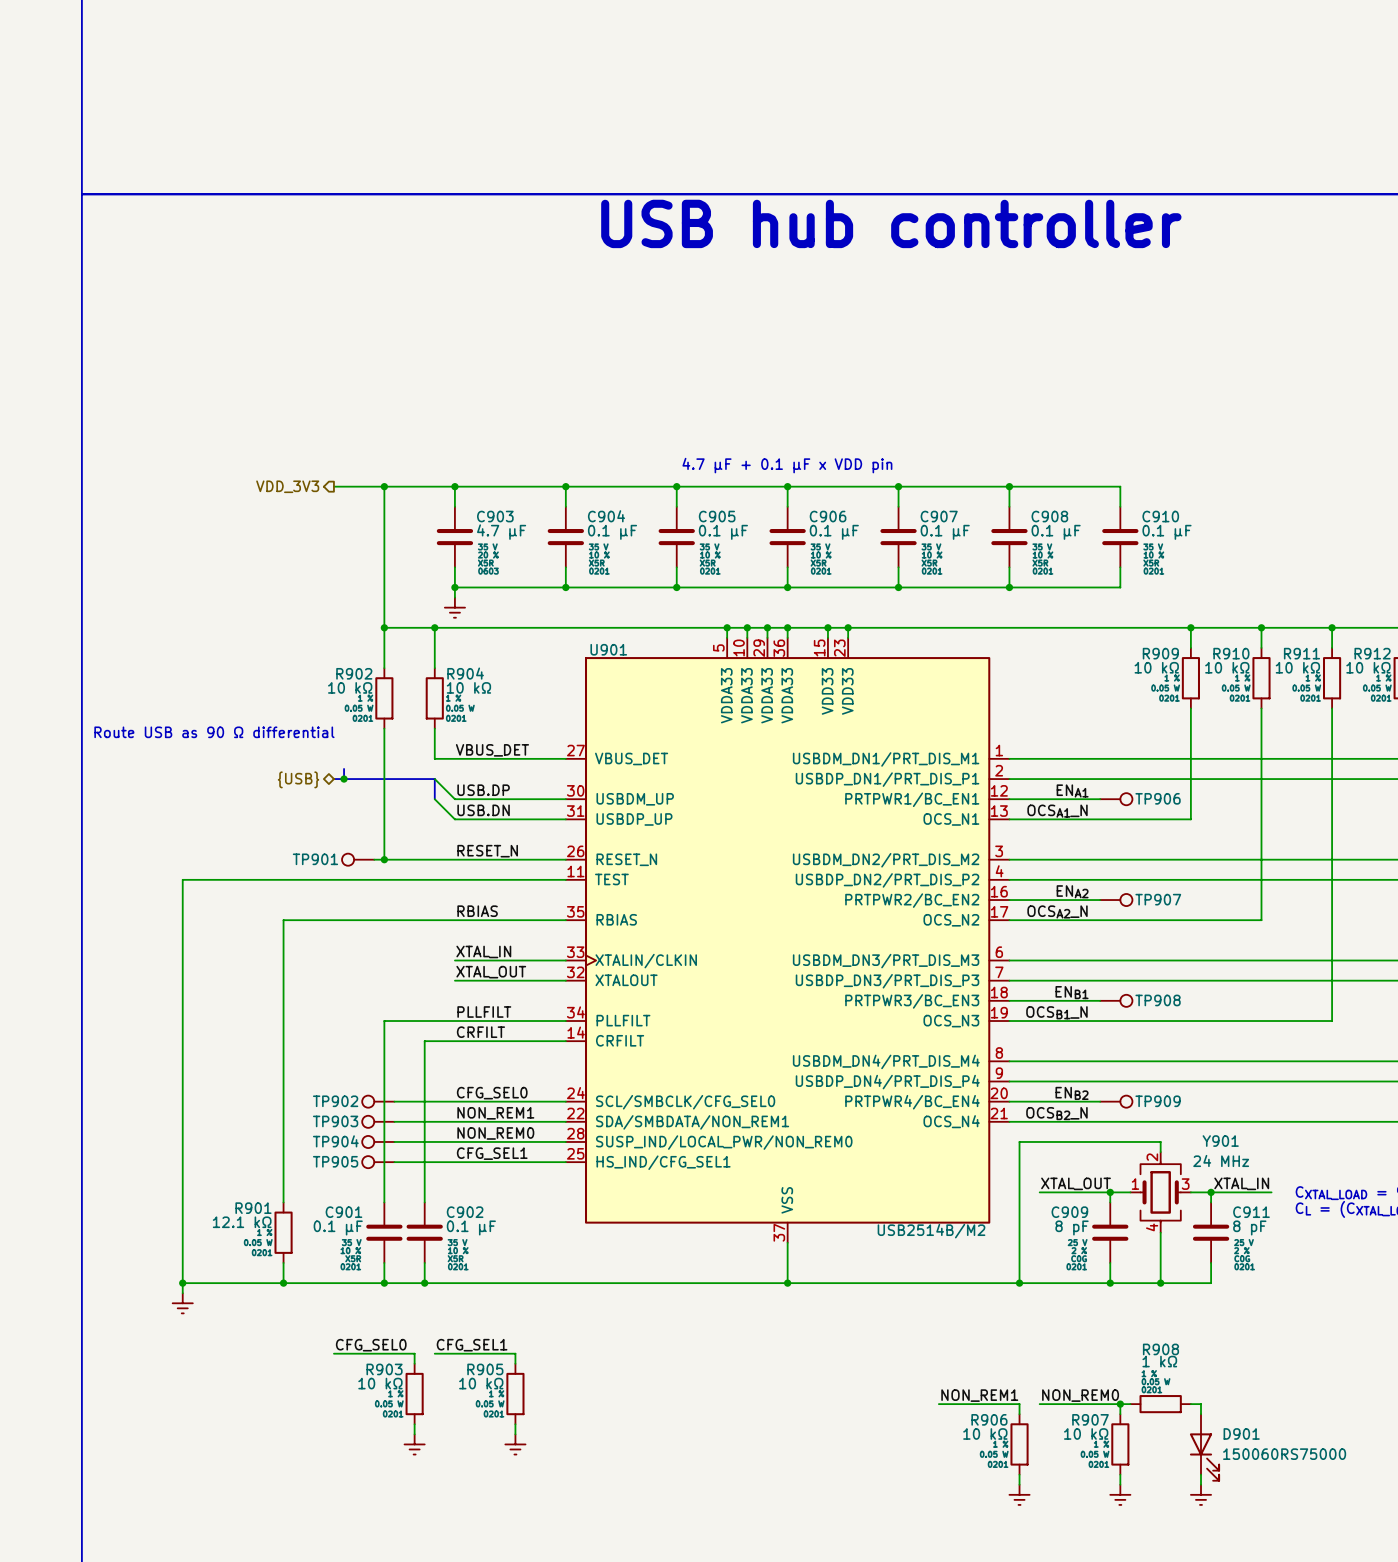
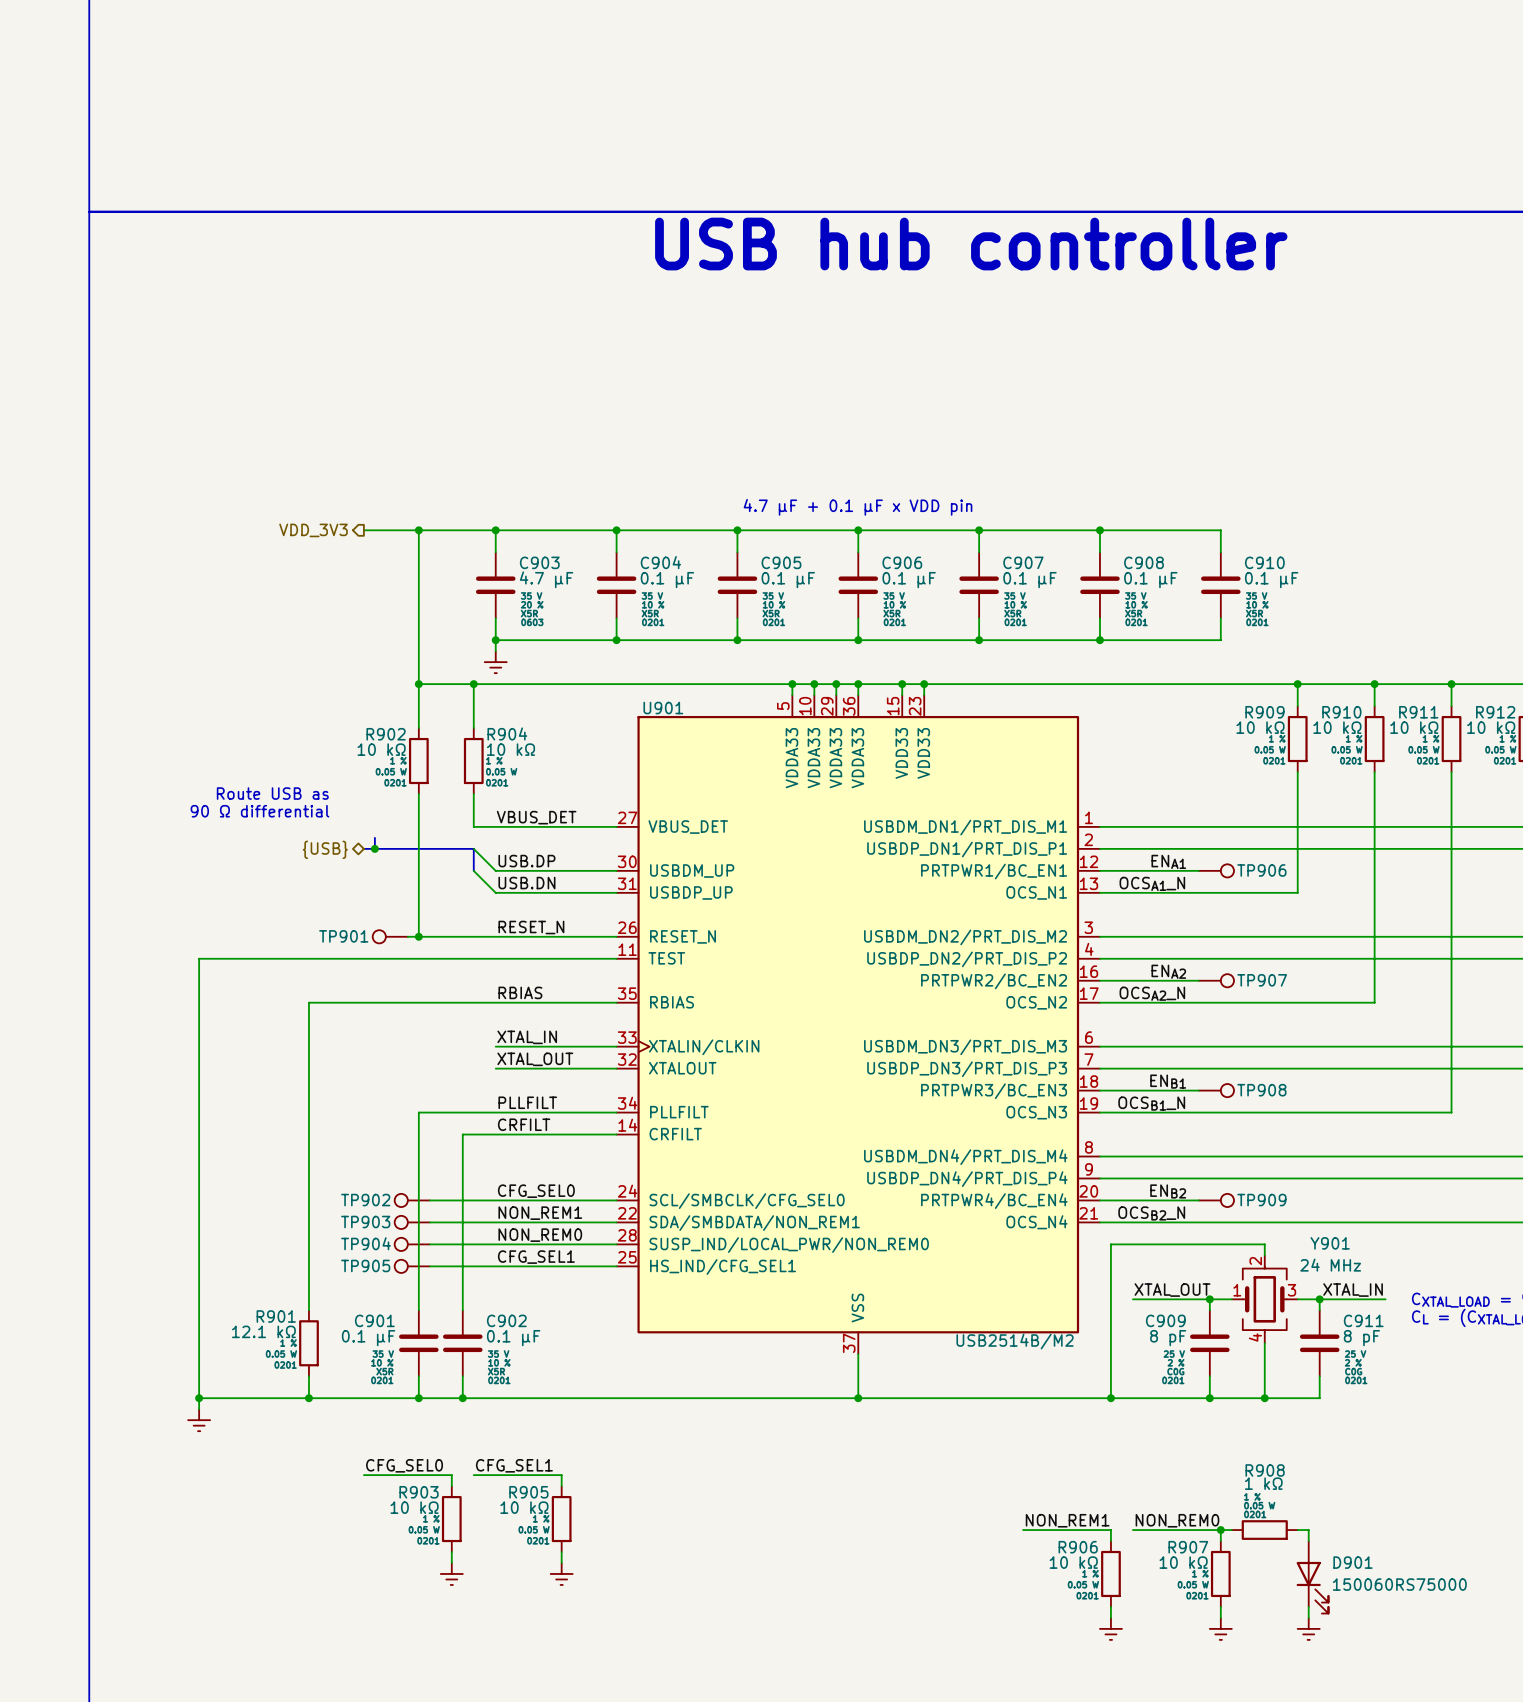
text: none -> Route USB as (272, 793)
text: Route USB as 90 Ω differential (214, 732) -> 90 Ω differential (259, 811)

